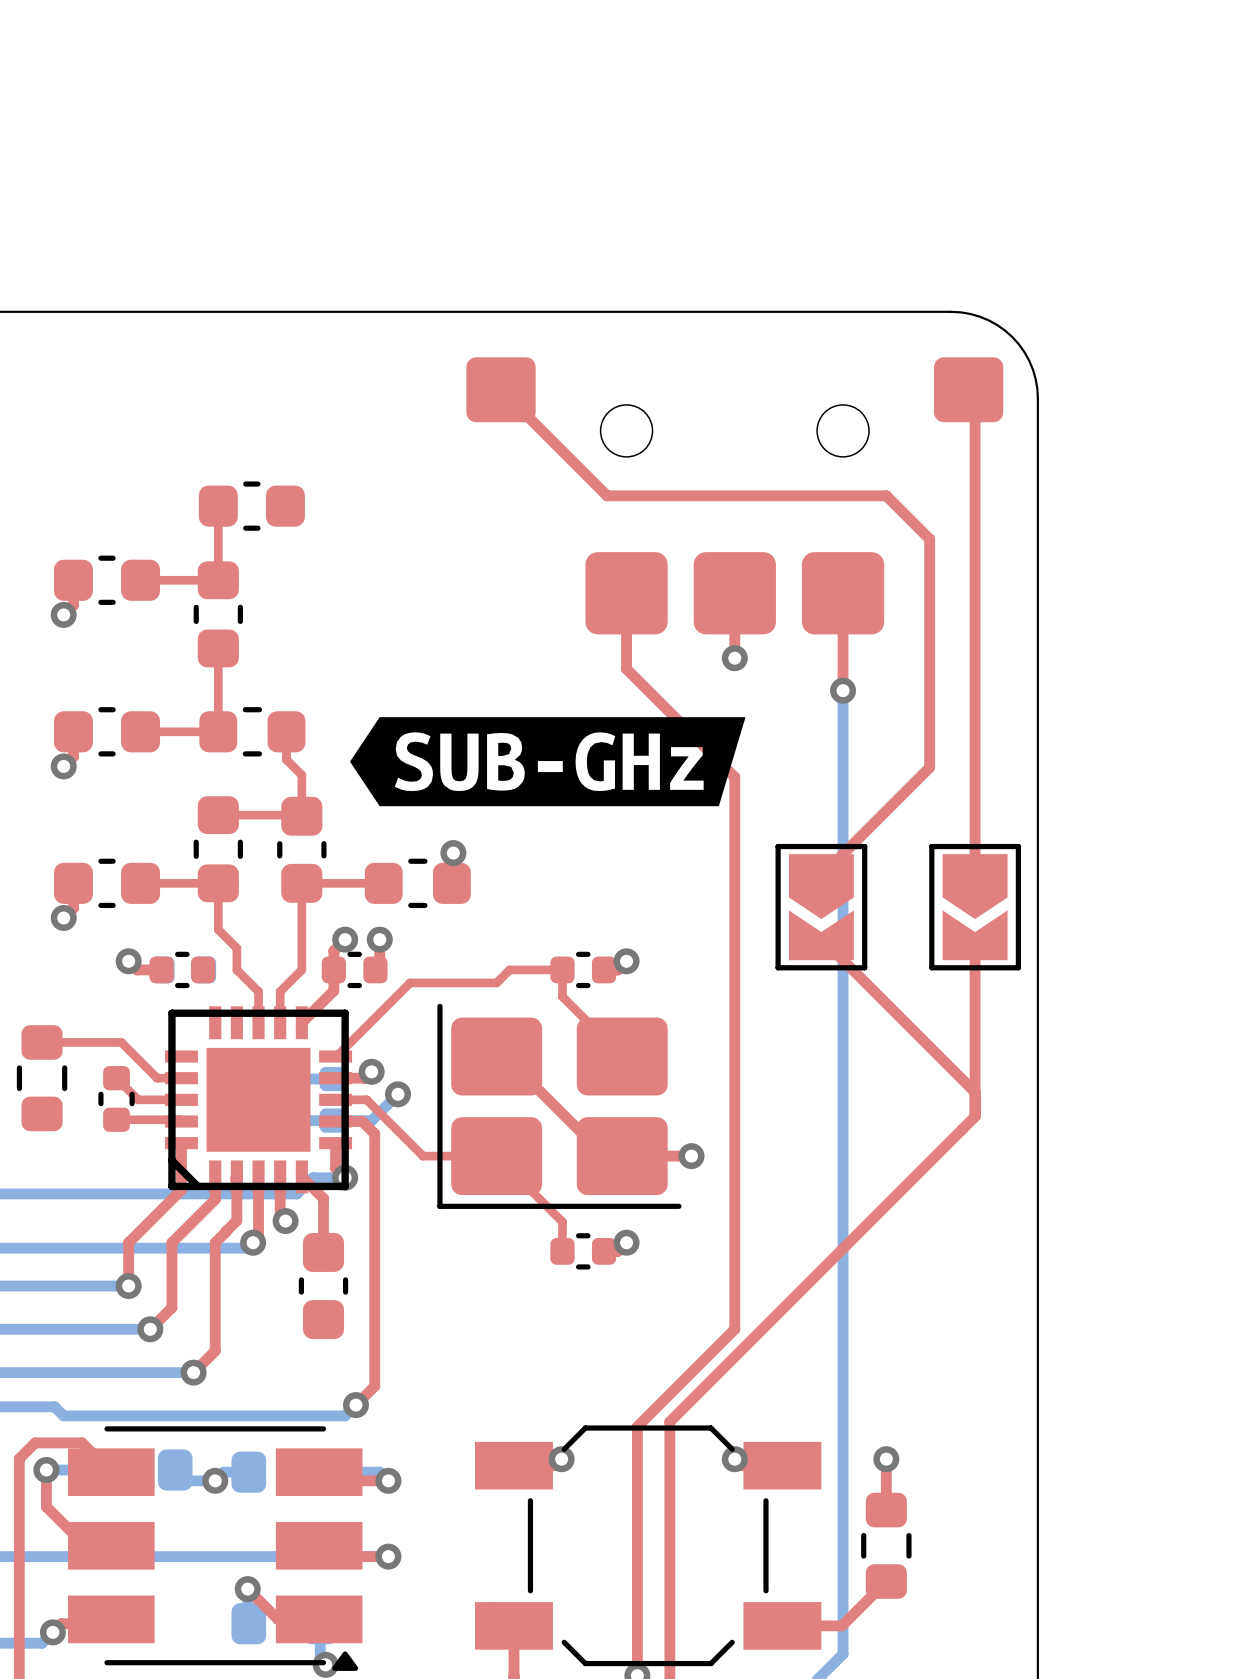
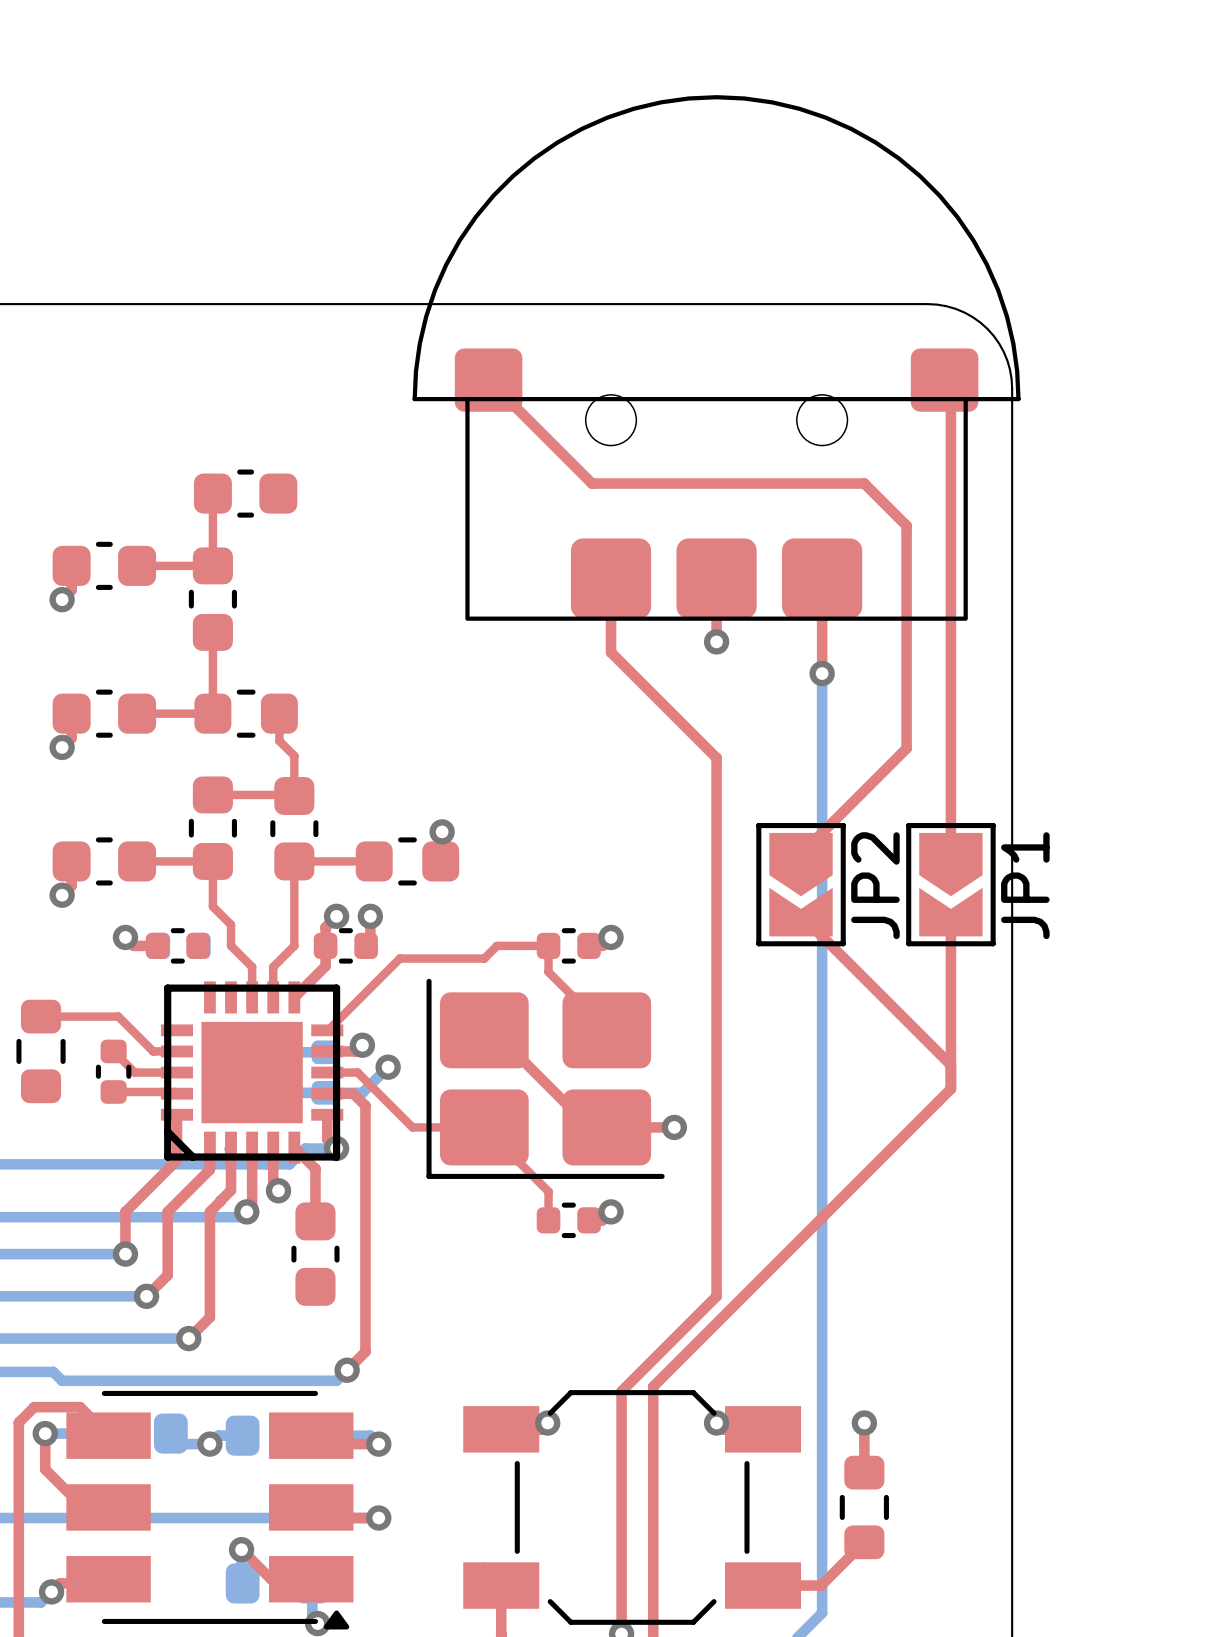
part: none -> (716, 357)
part: (734, 495) -> none
drawing: [350, 717, 746, 807] -> none
JP2 name: none -> JP2 (875, 885)
JP1 name: none -> JP1 (1025, 885)

